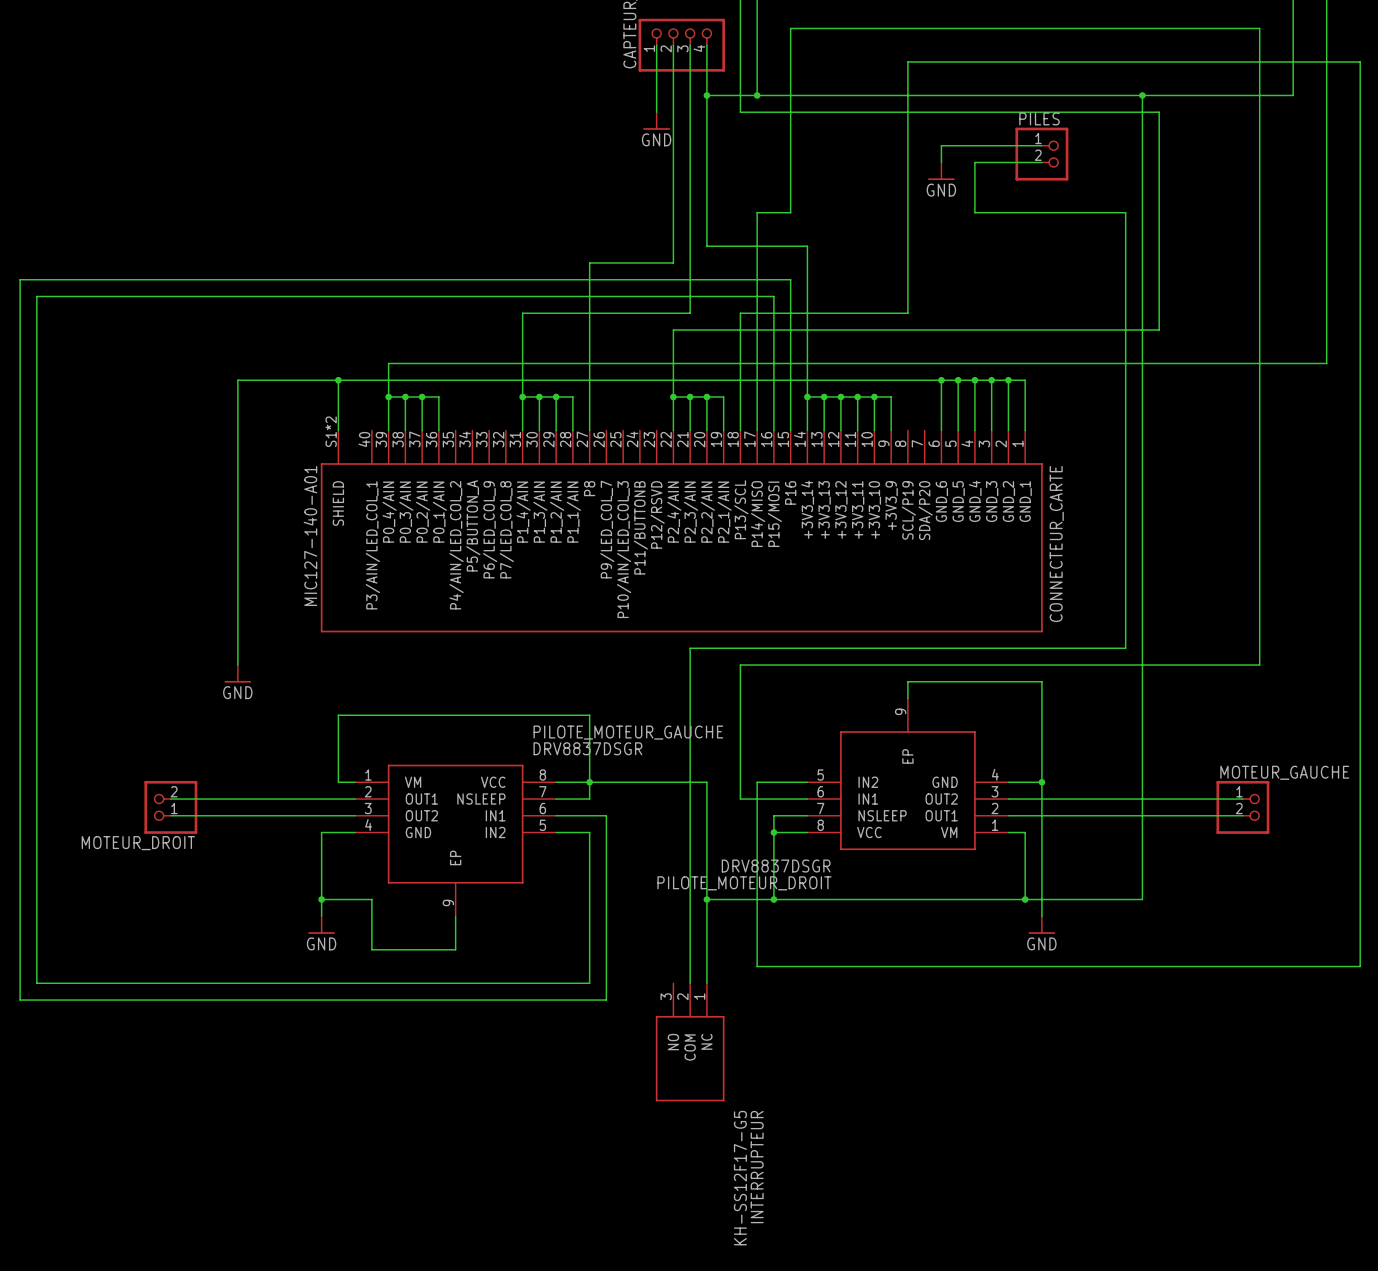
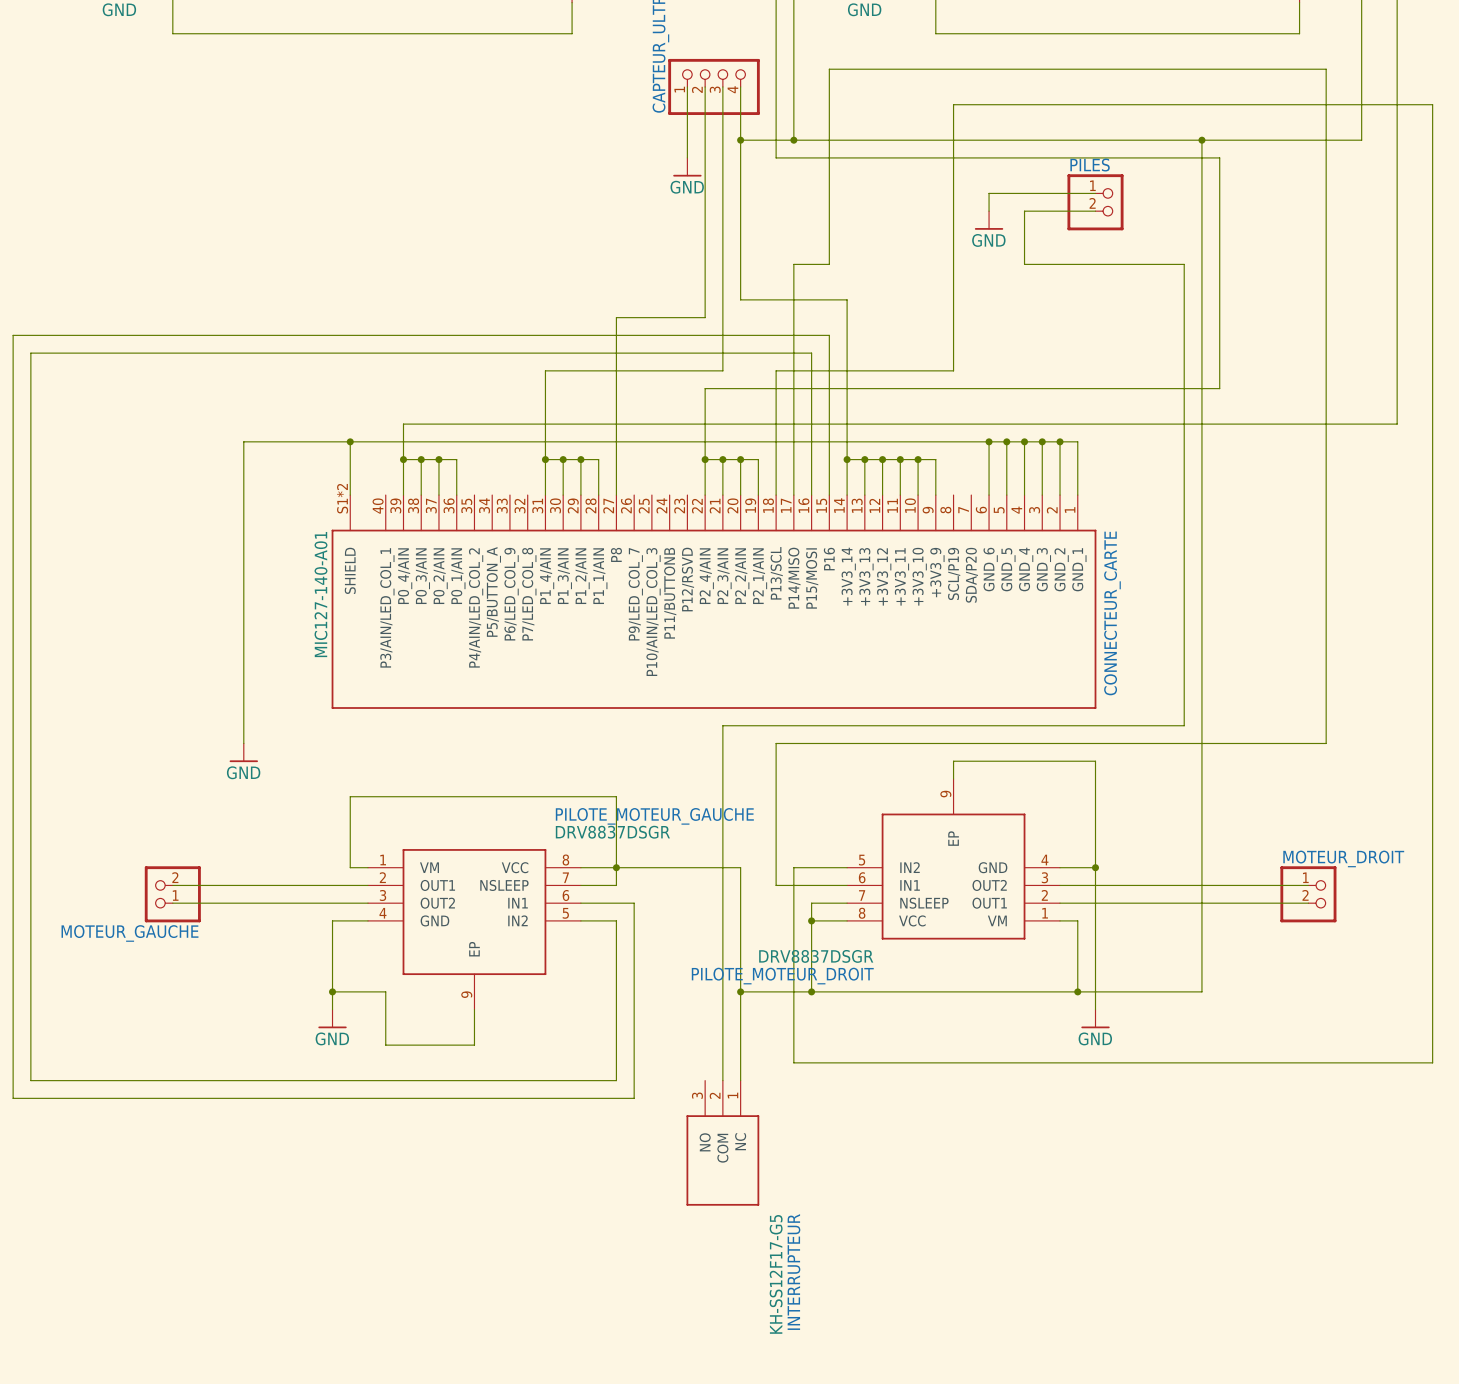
MOTEUR_GAUCHE name: MOTEUR_GAUCHE (1284, 772) -> MOTEUR_DROIT (1343, 858)
MOTEUR_DROIT name: MOTEUR_DROIT (138, 843) -> MOTEUR_GAUCHE (129, 933)

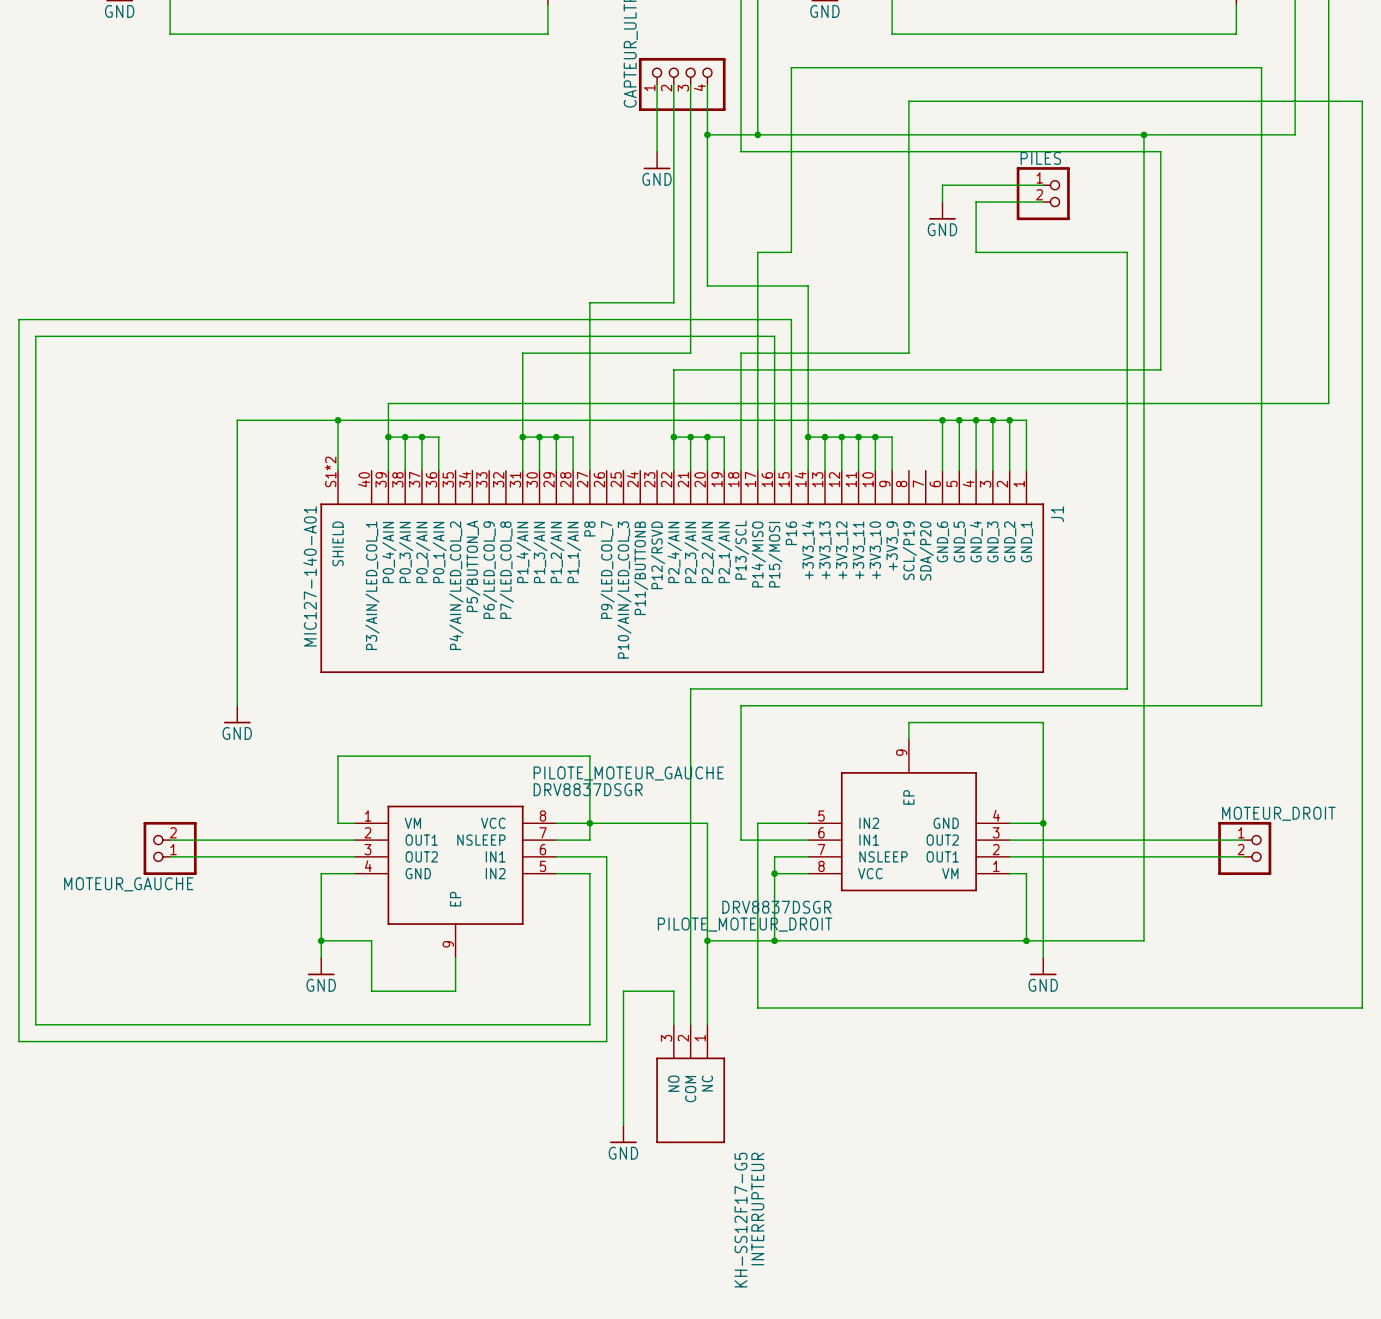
CONNECTEUR_CARTE name: CONNECTEUR_CARTE (1112, 613) -> J1 (1057, 514)
wire: none -> (673, 1024) (673, 991) (623, 991) (623, 1125)
power symbol: none -> GND (623, 1134)

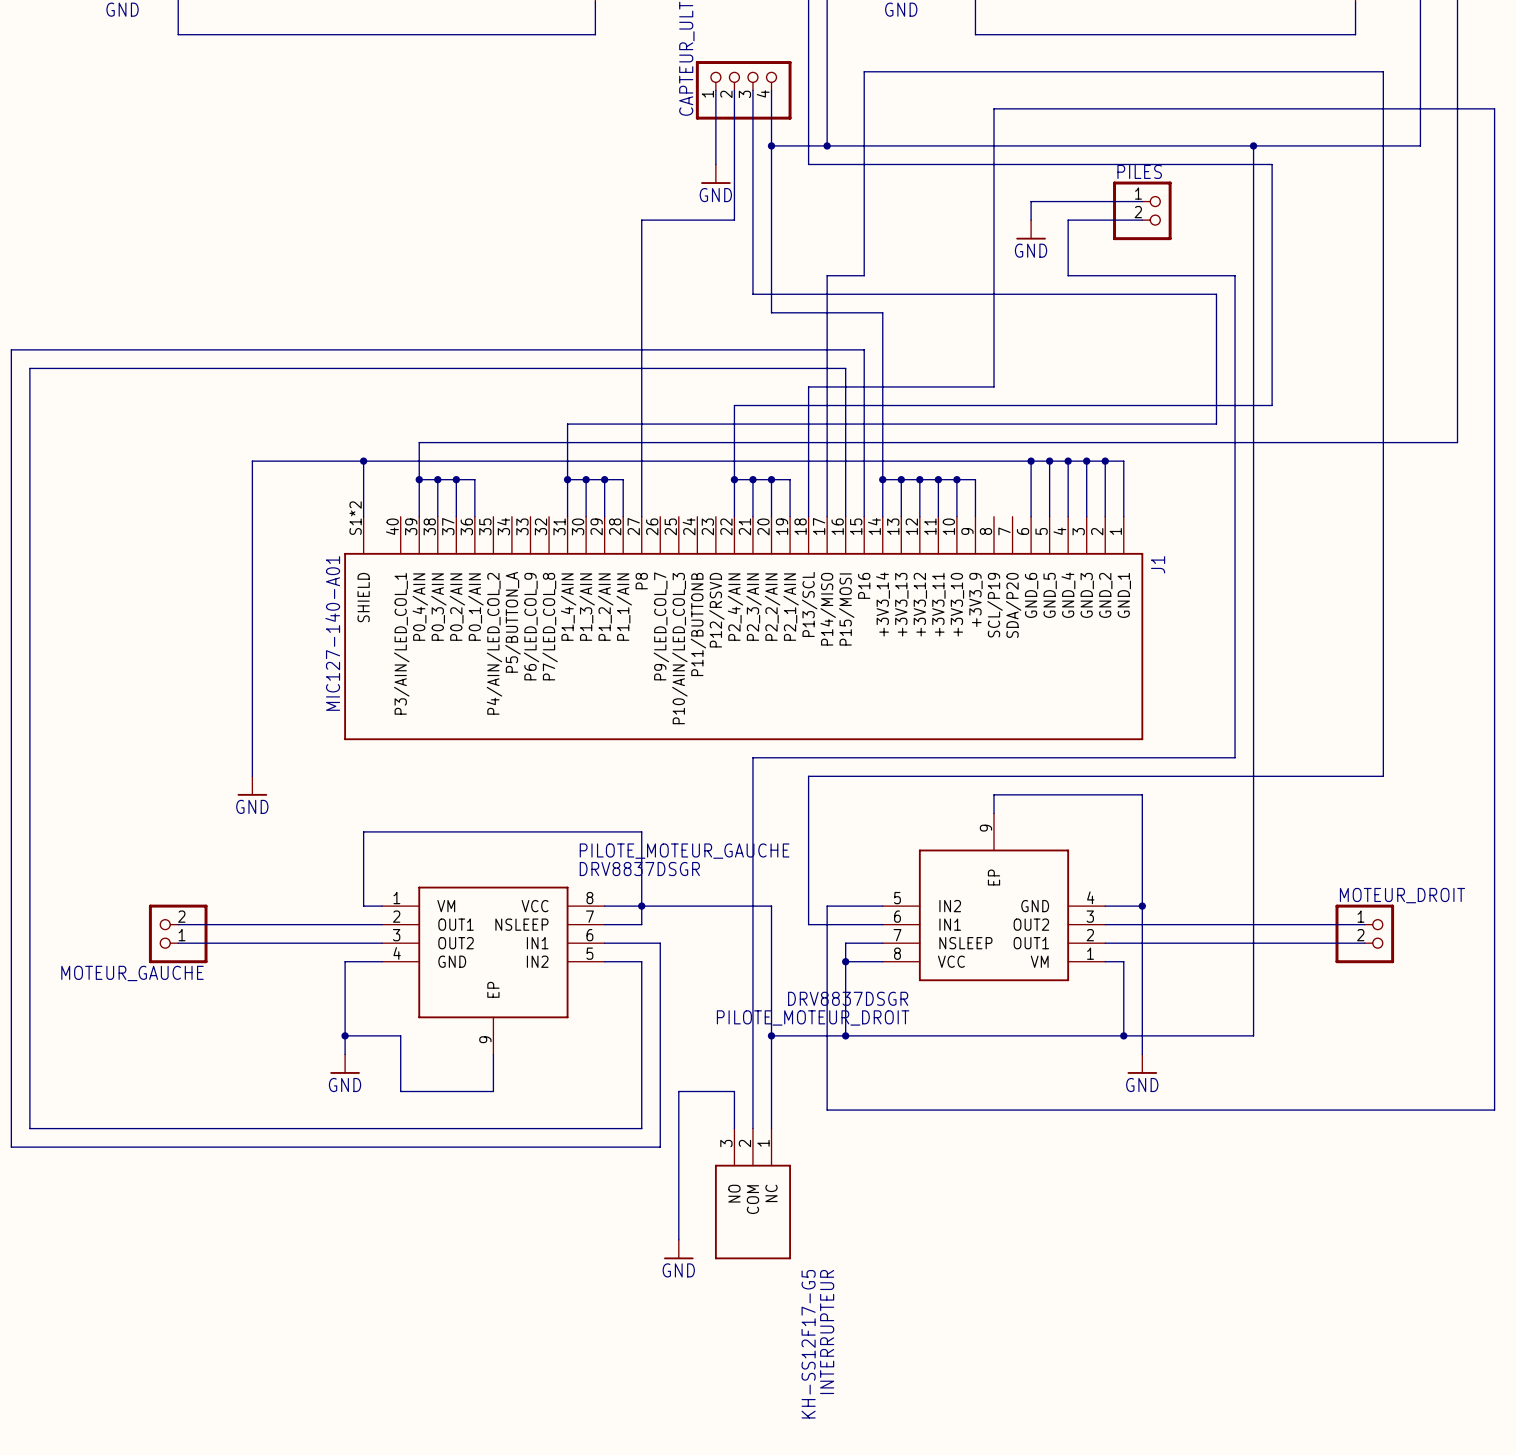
wire: (673, 202) (673, 302) (589, 302) -> (734, 220) (641, 220) (641, 331)
wire: (690, 269) (690, 353) (522, 353) (522, 386) -> (752, 294) (1216, 294) (1216, 424) (567, 424)

